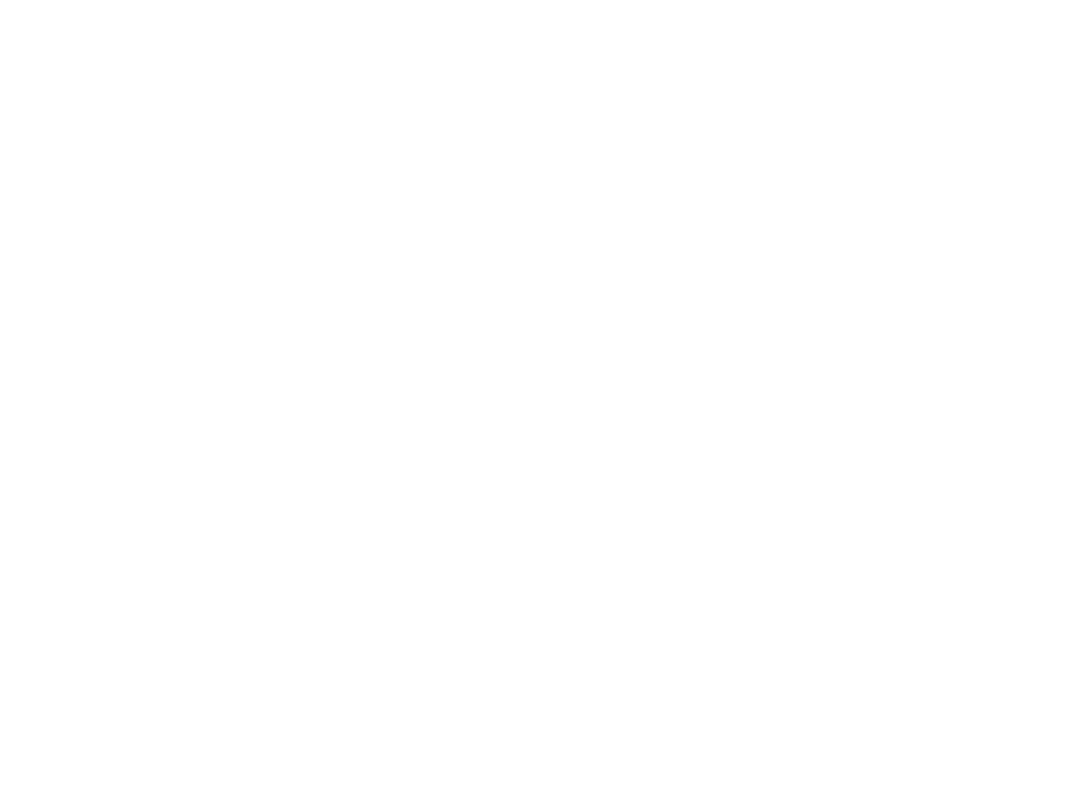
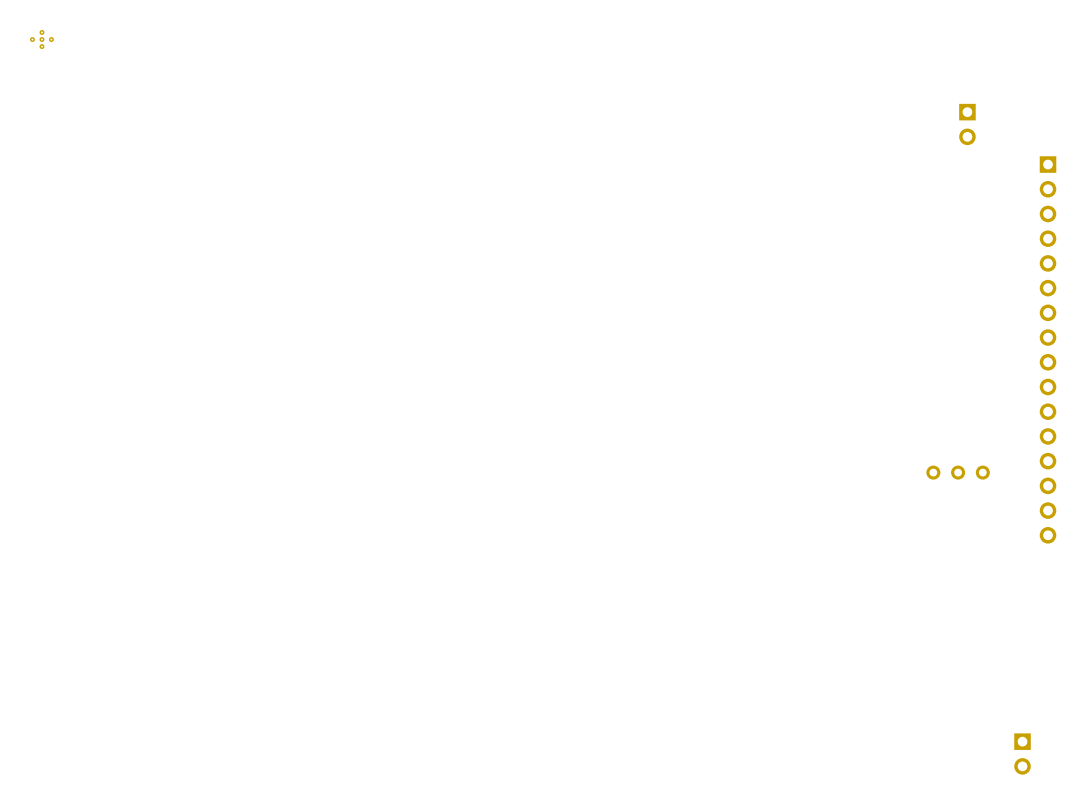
part: none -> (41, 39)
part: none -> (967, 124)
part: none -> (1048, 349)
part: none -> (958, 472)
part: none -> (1022, 754)

